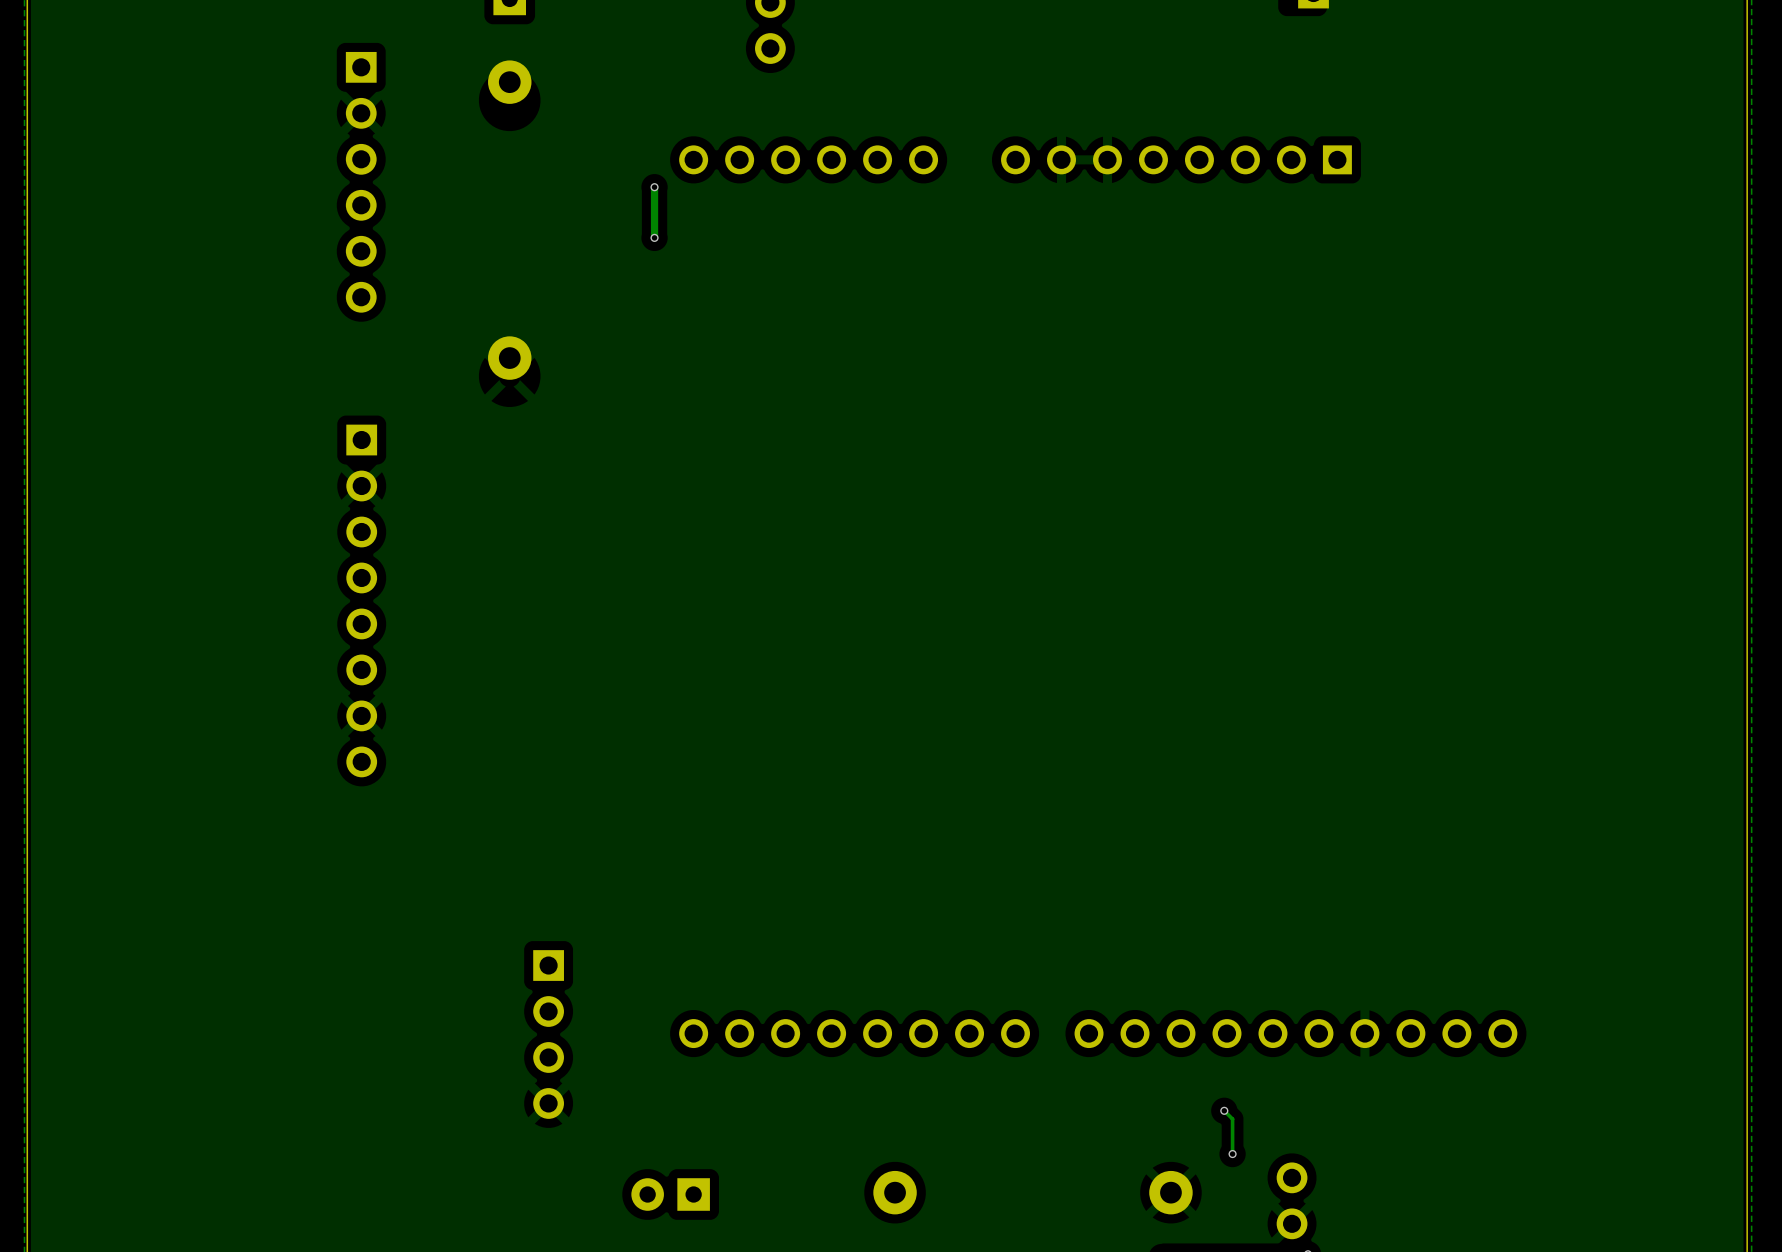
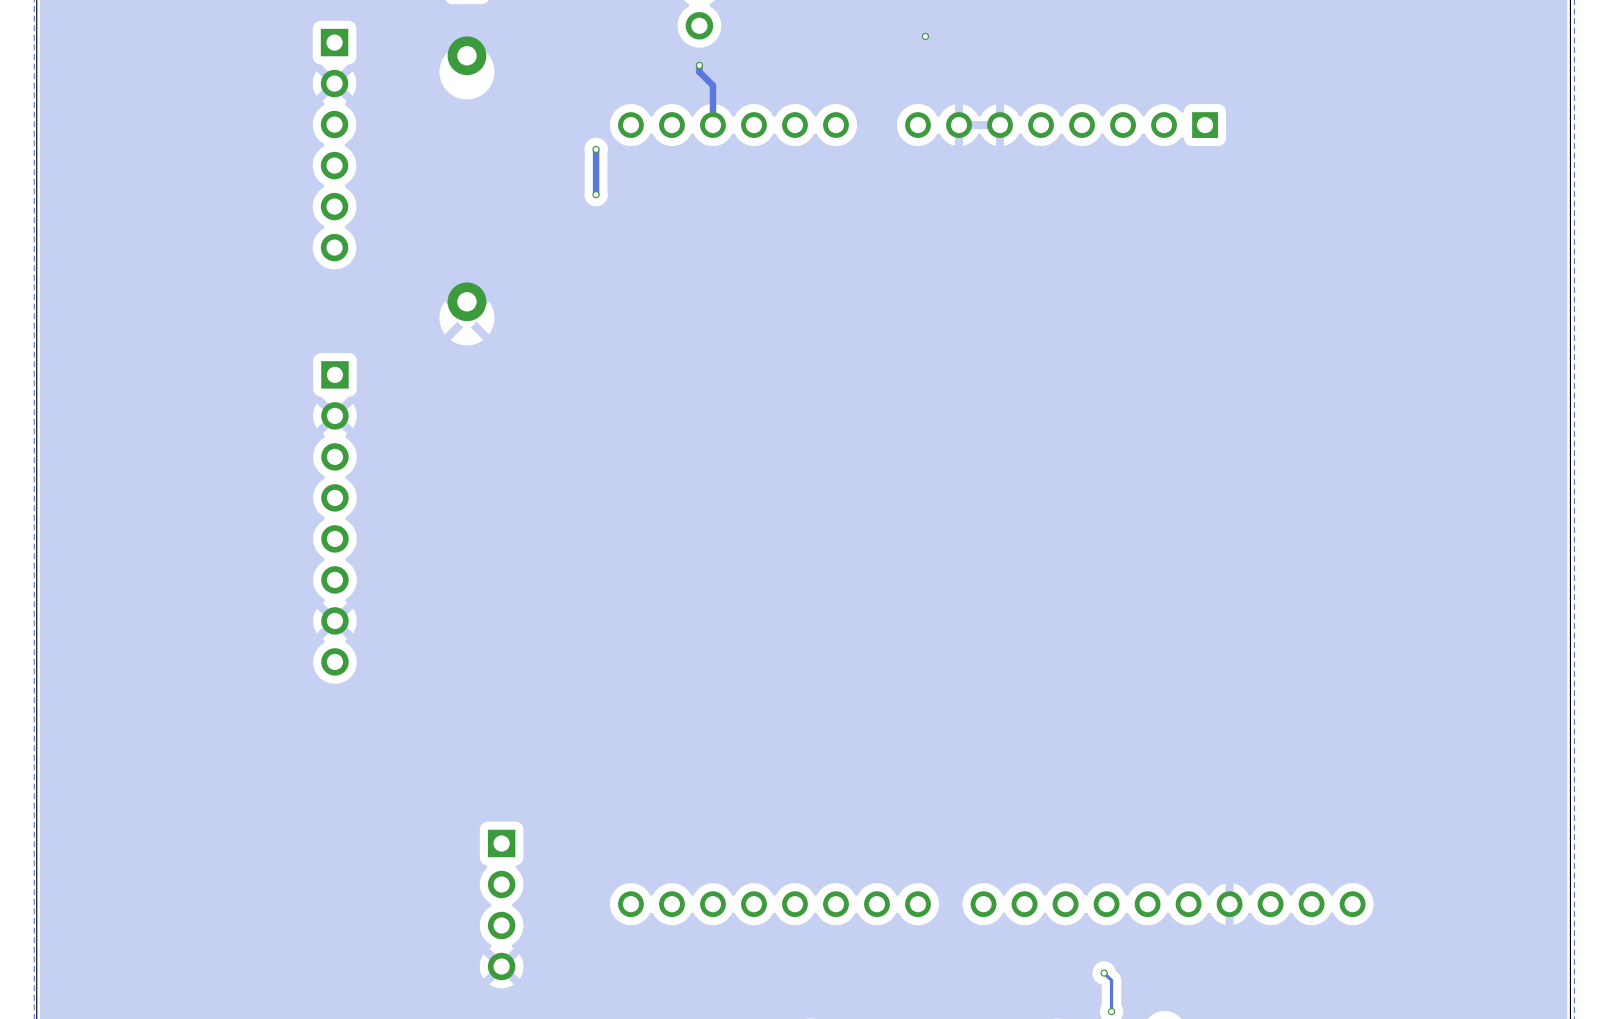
via: none -> (925, 36)
track: none -> (699, 65) (699, 71) (712, 85) (712, 125)
via: none -> (699, 65)

